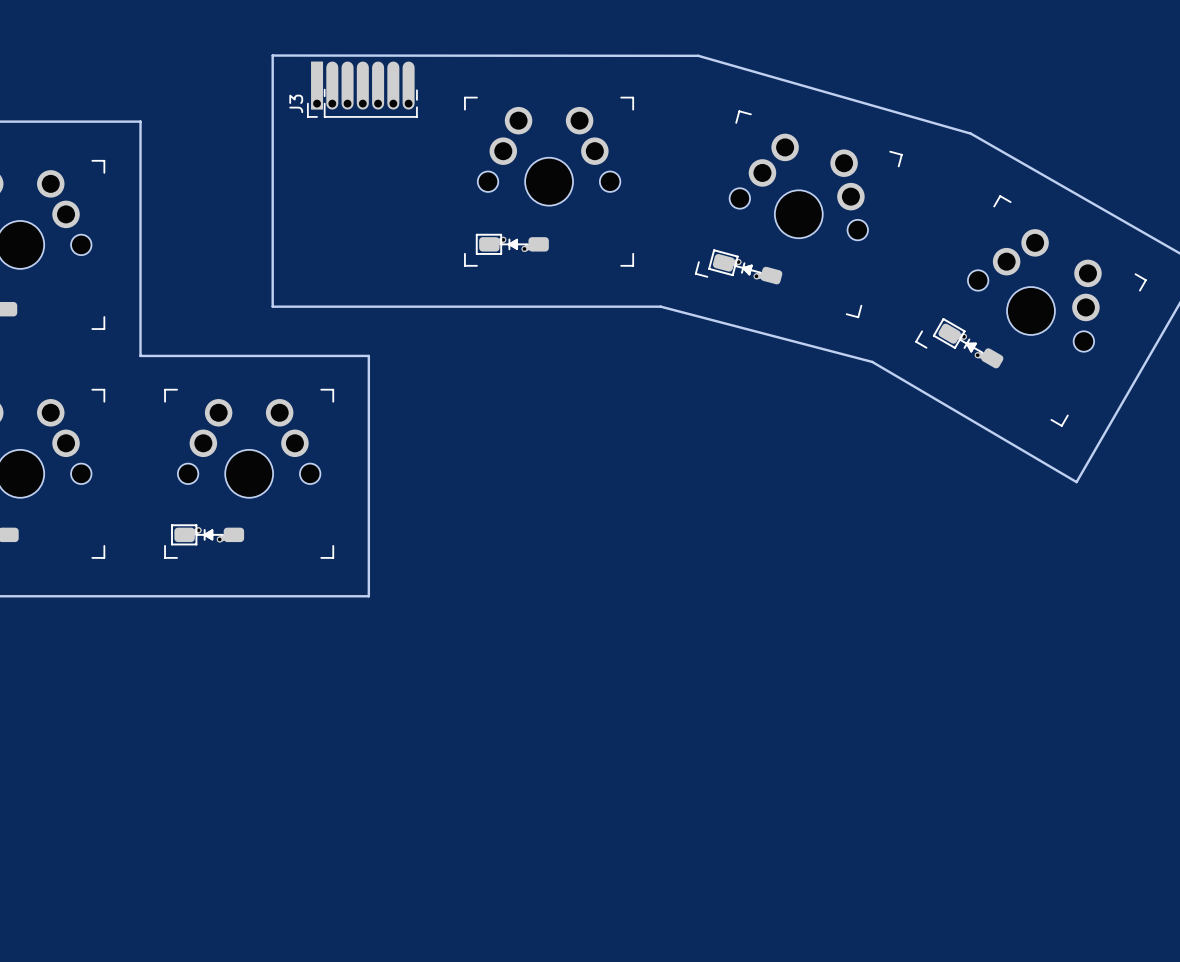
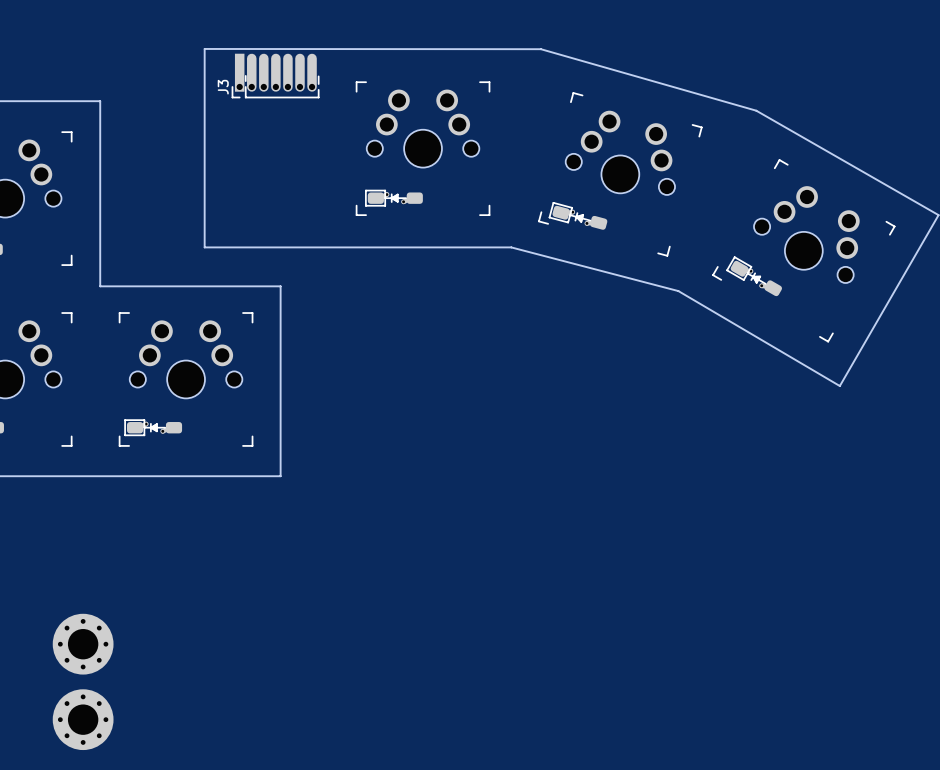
part: none -> (83, 644)
part: none -> (83, 719)

